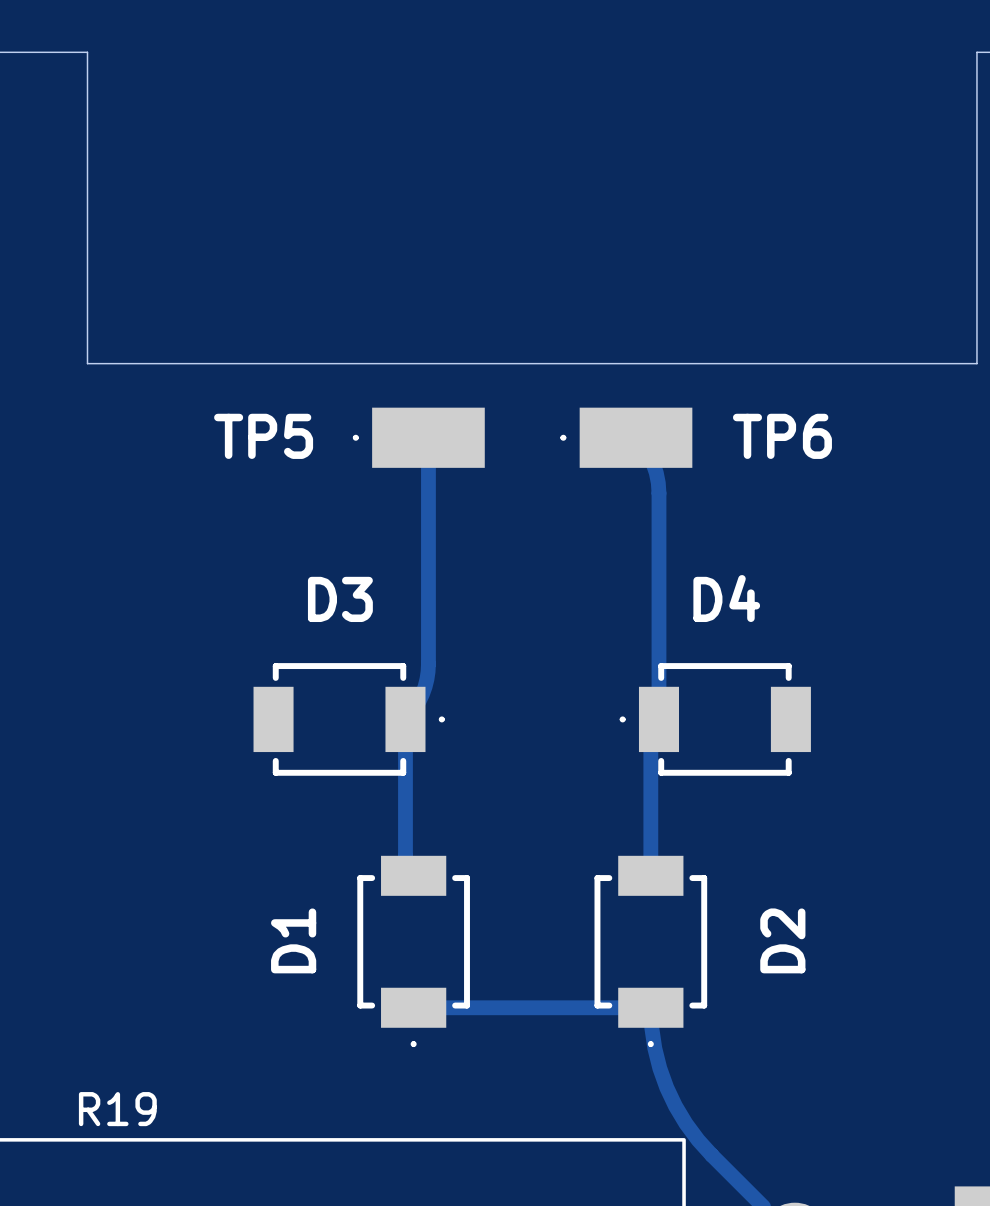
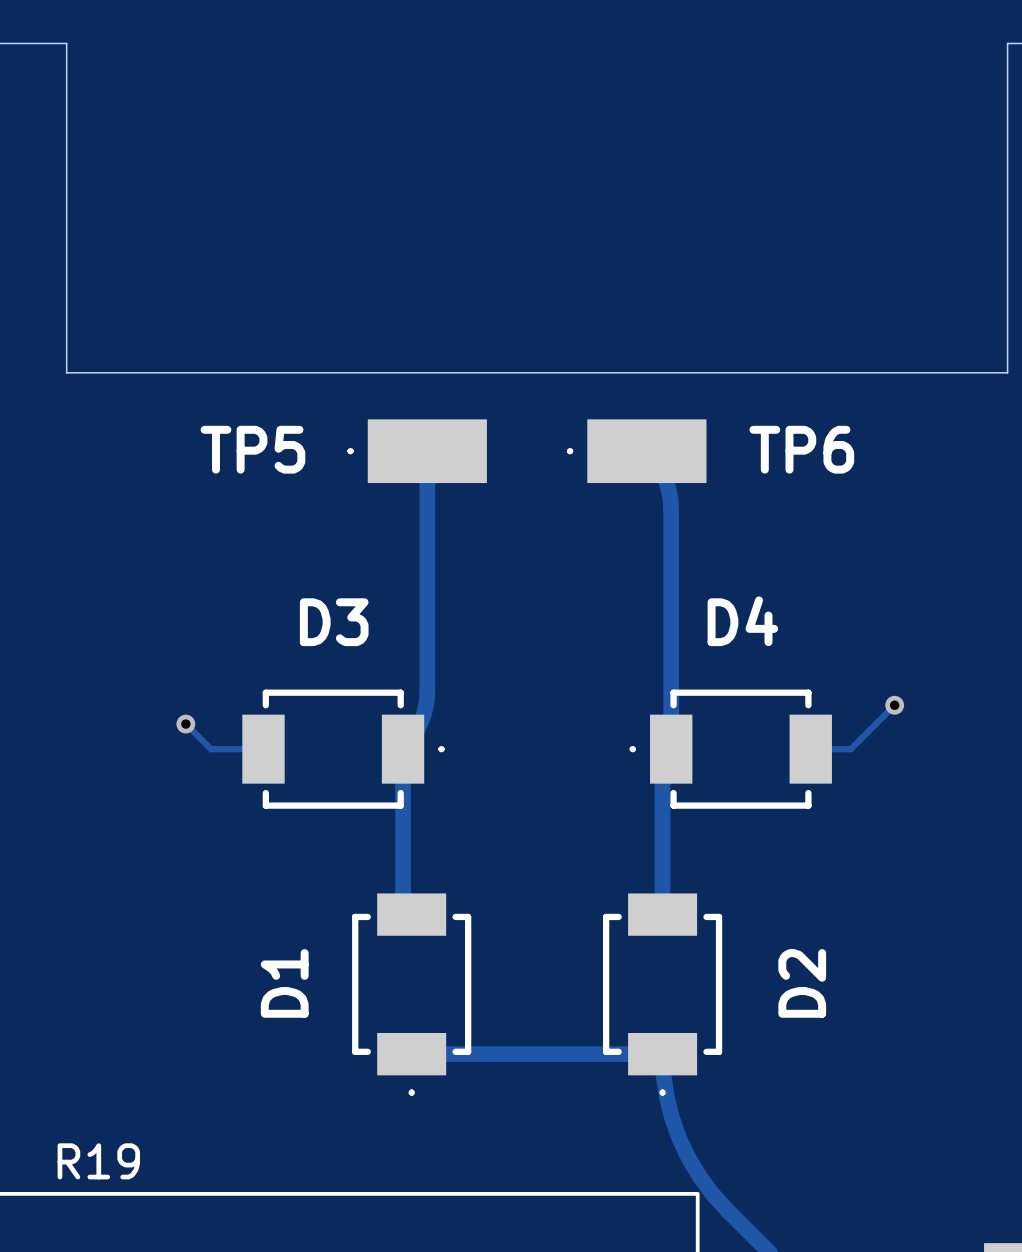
track: none -> (894, 705) (850, 749) (810, 749)
via: none -> (894, 705)
track: none -> (185, 724) (210, 749) (263, 749)
via: none -> (185, 724)

